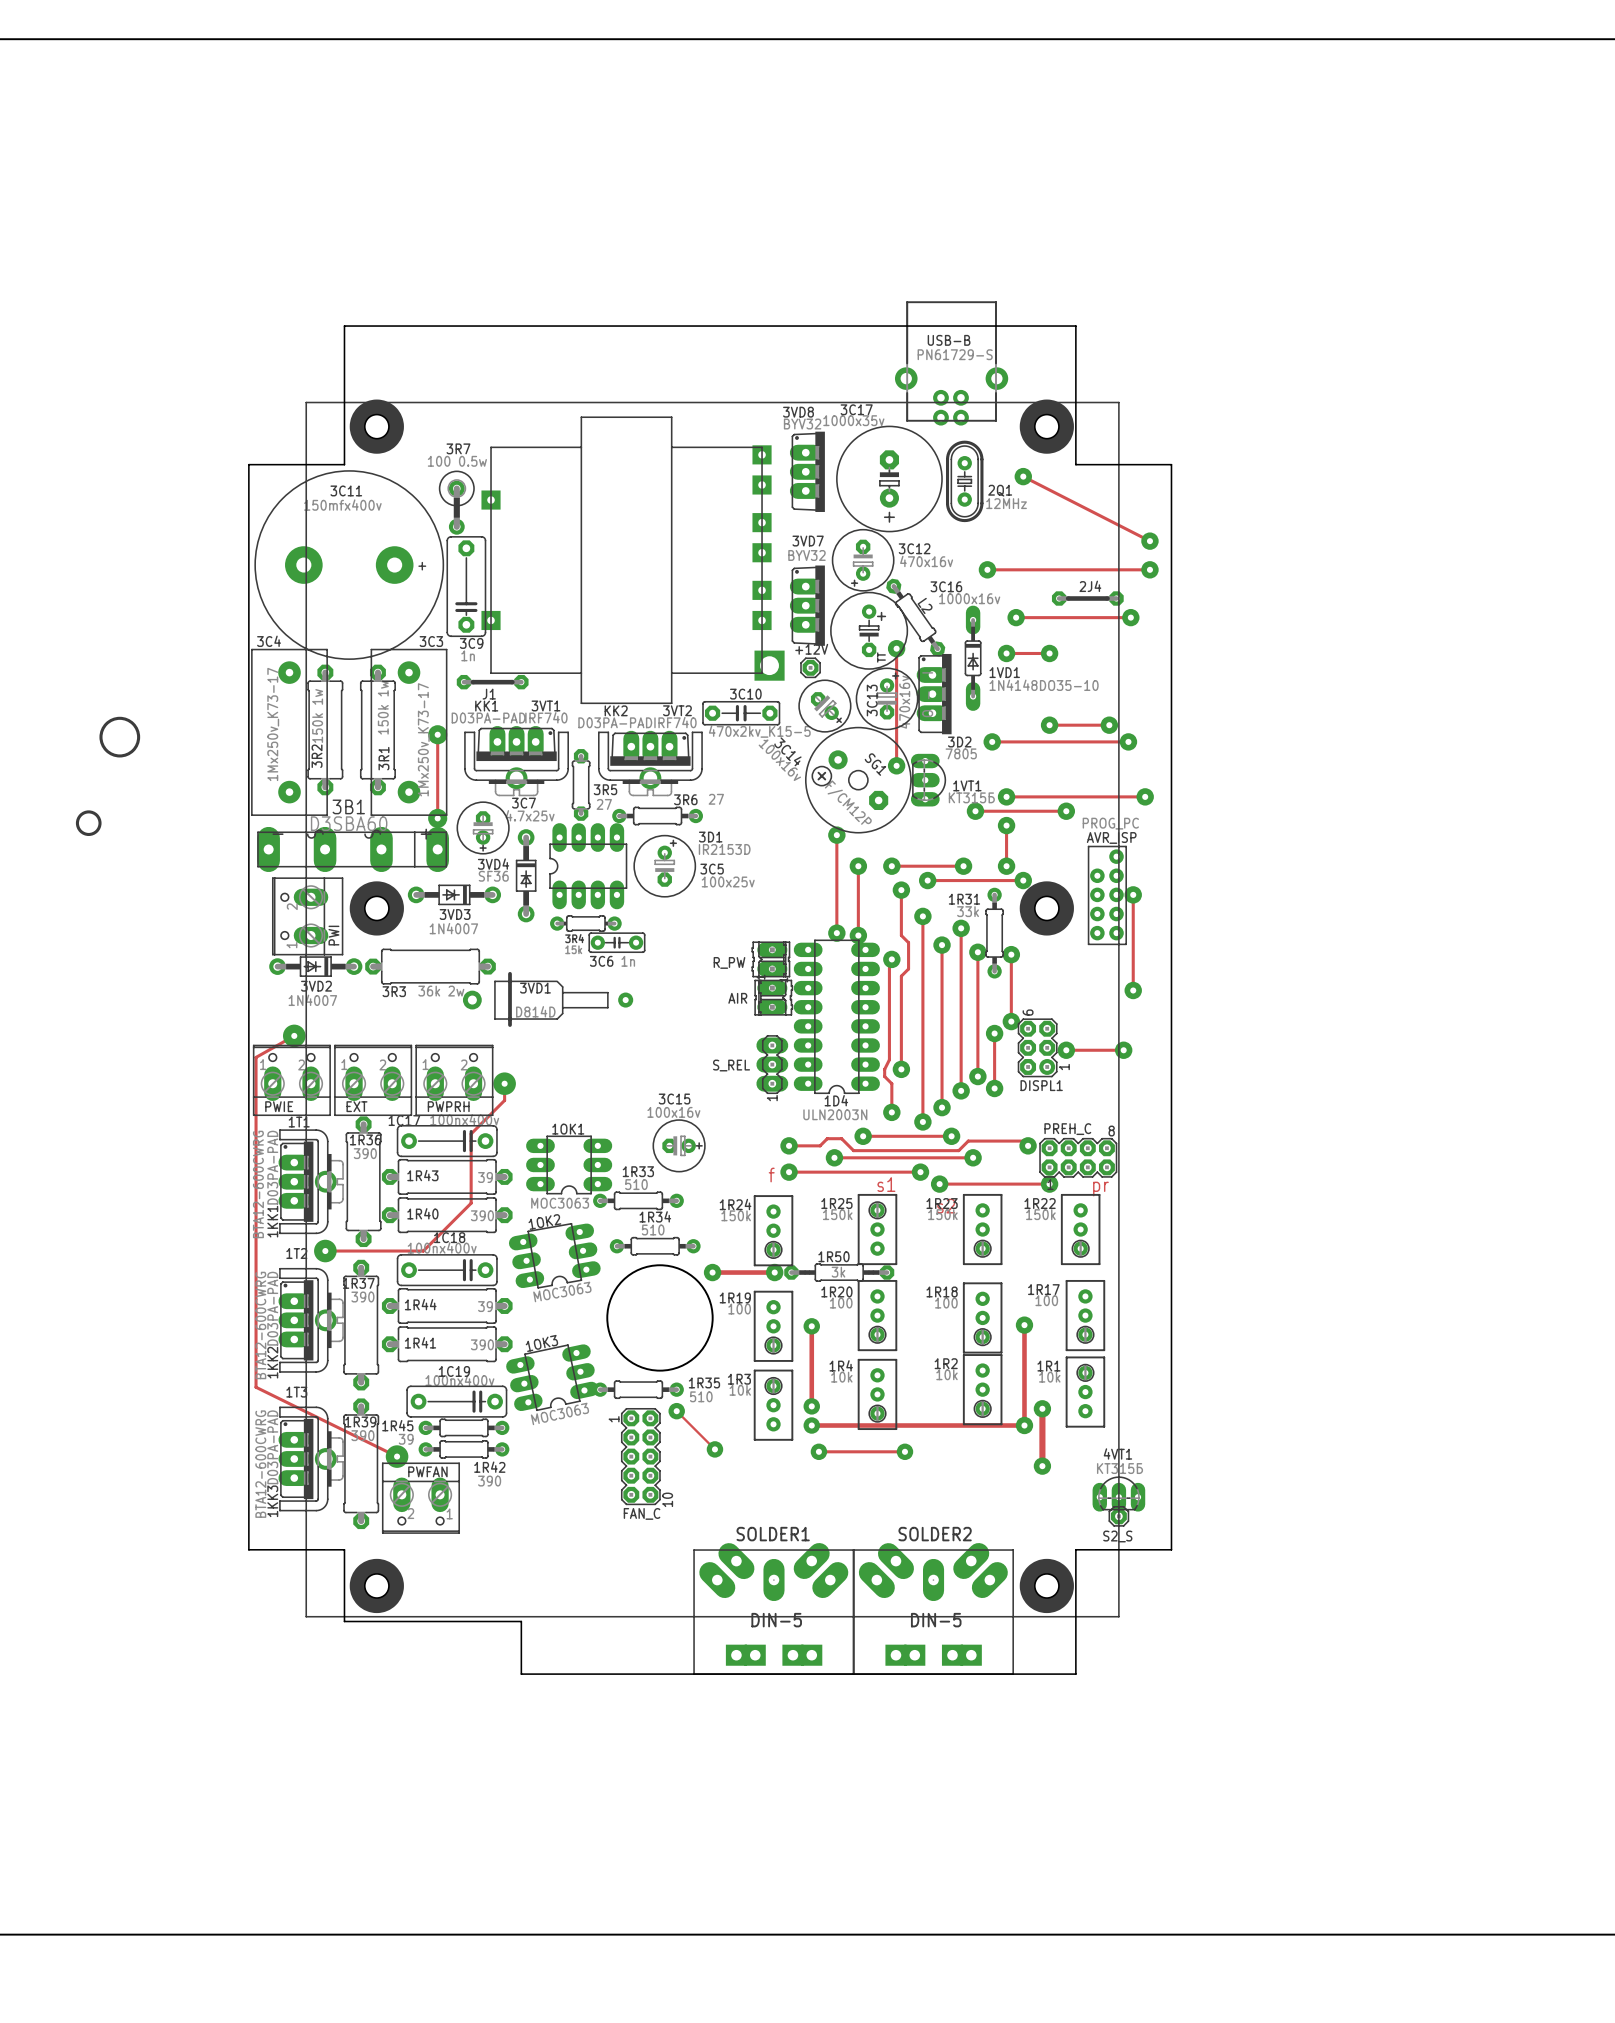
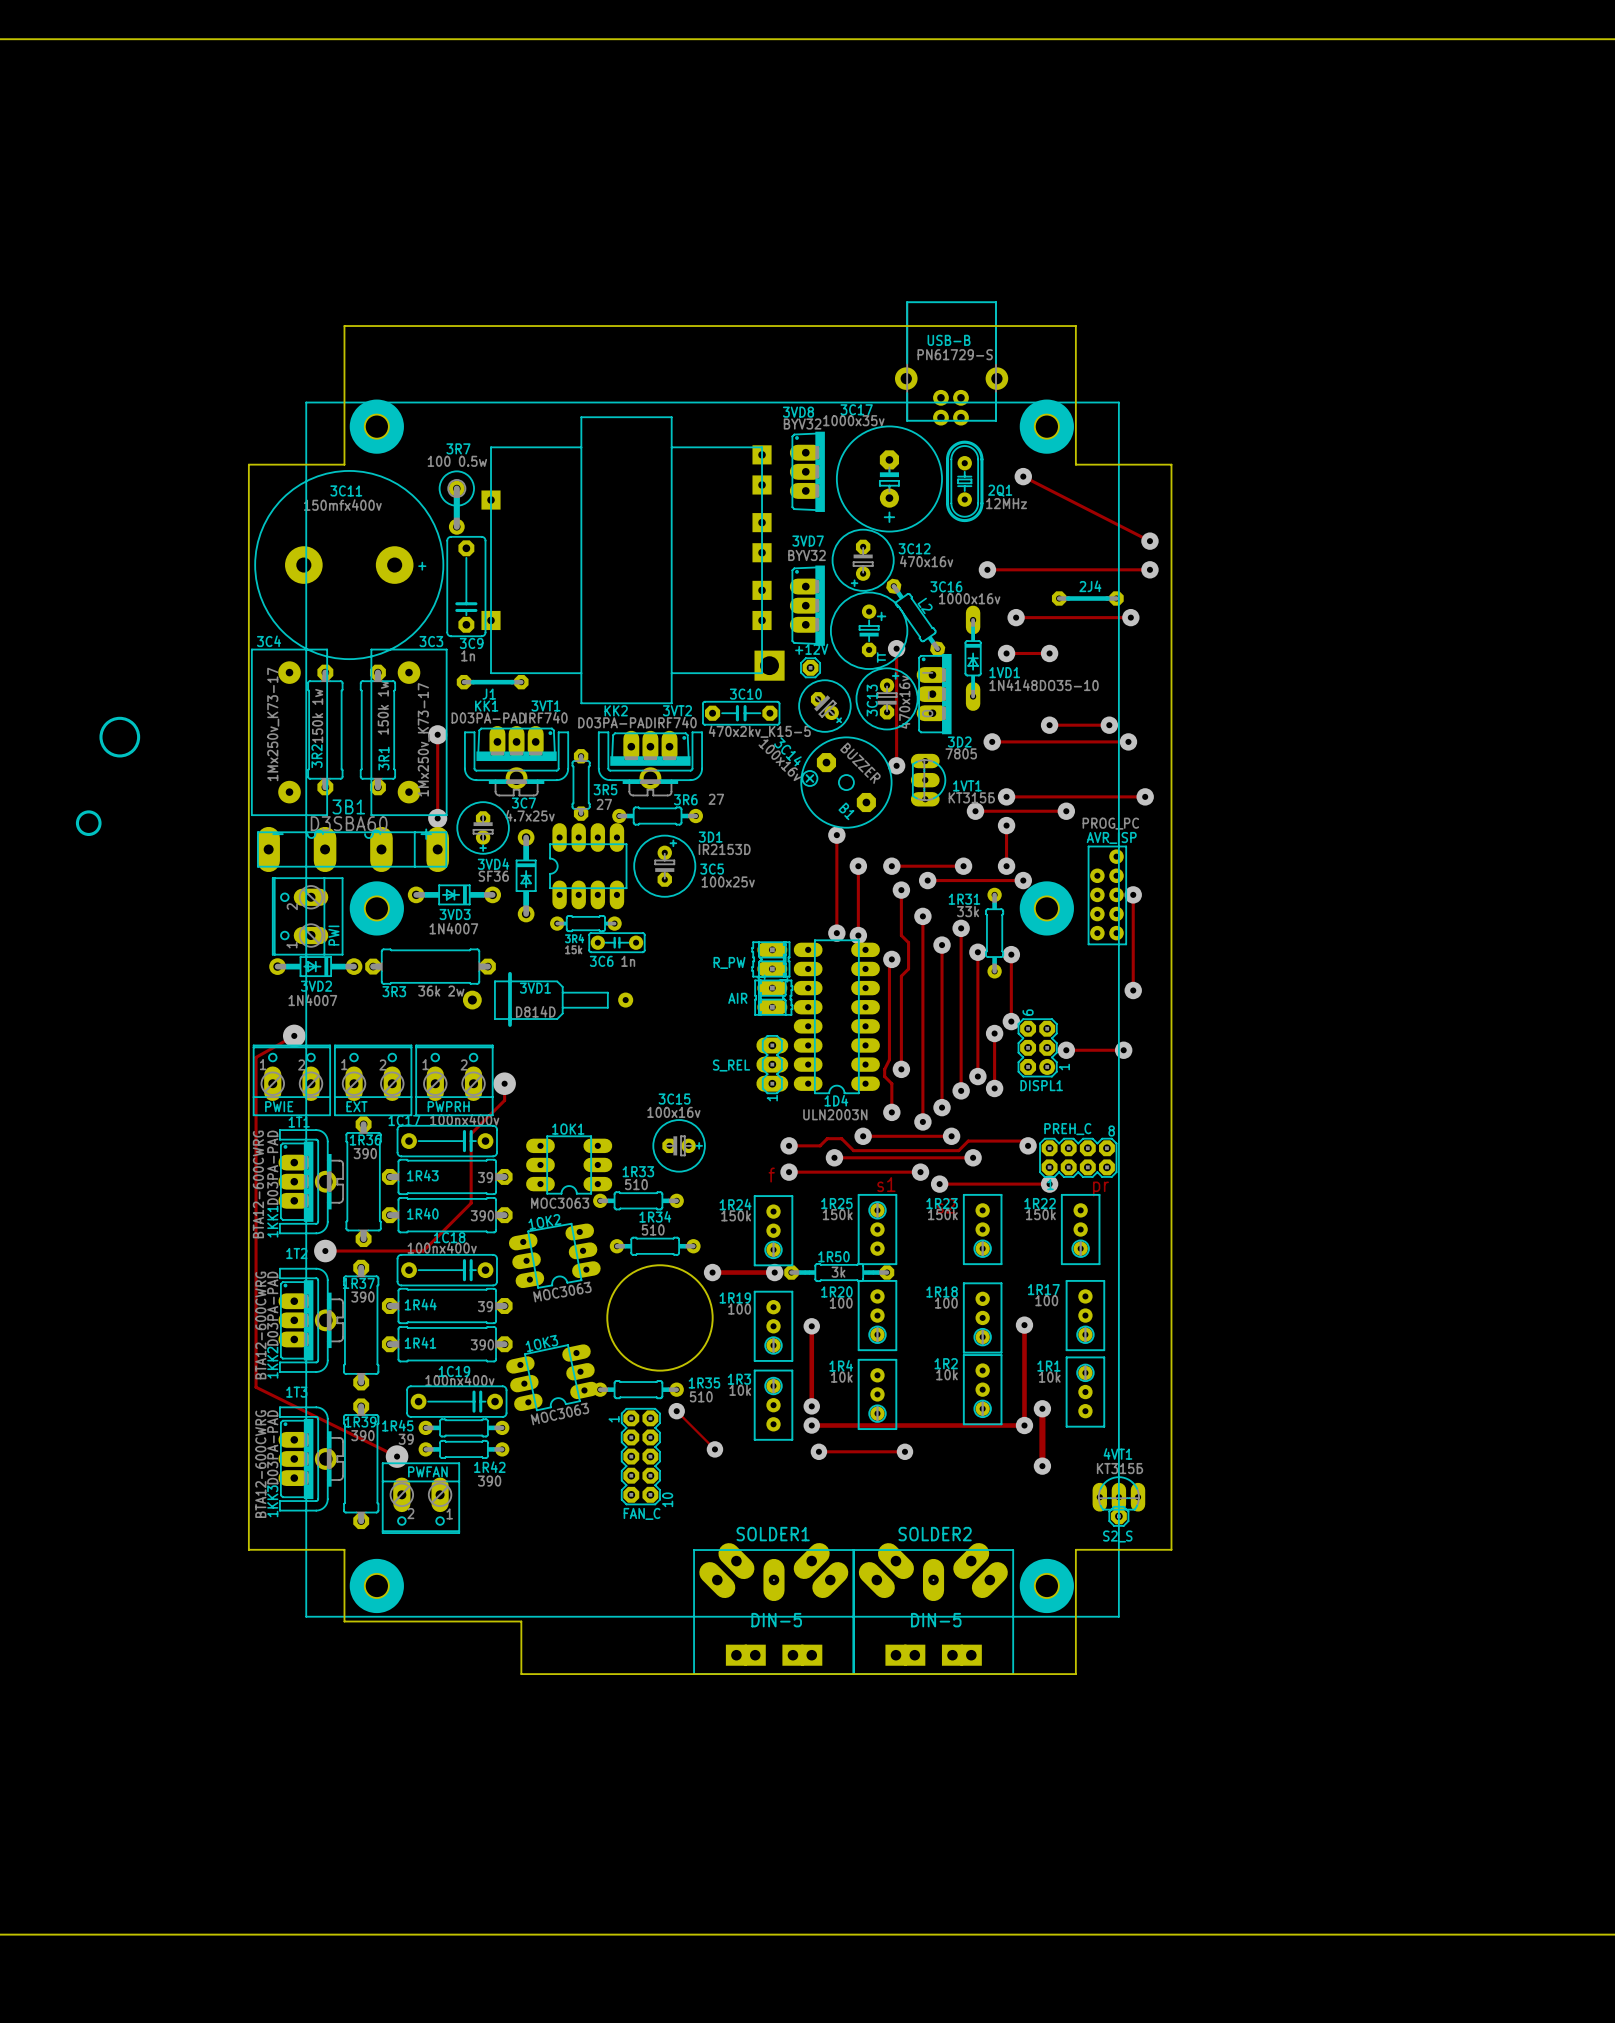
SG1: F/CM12P (858, 780) -> none
B1: none -> BUZZER (846, 782)

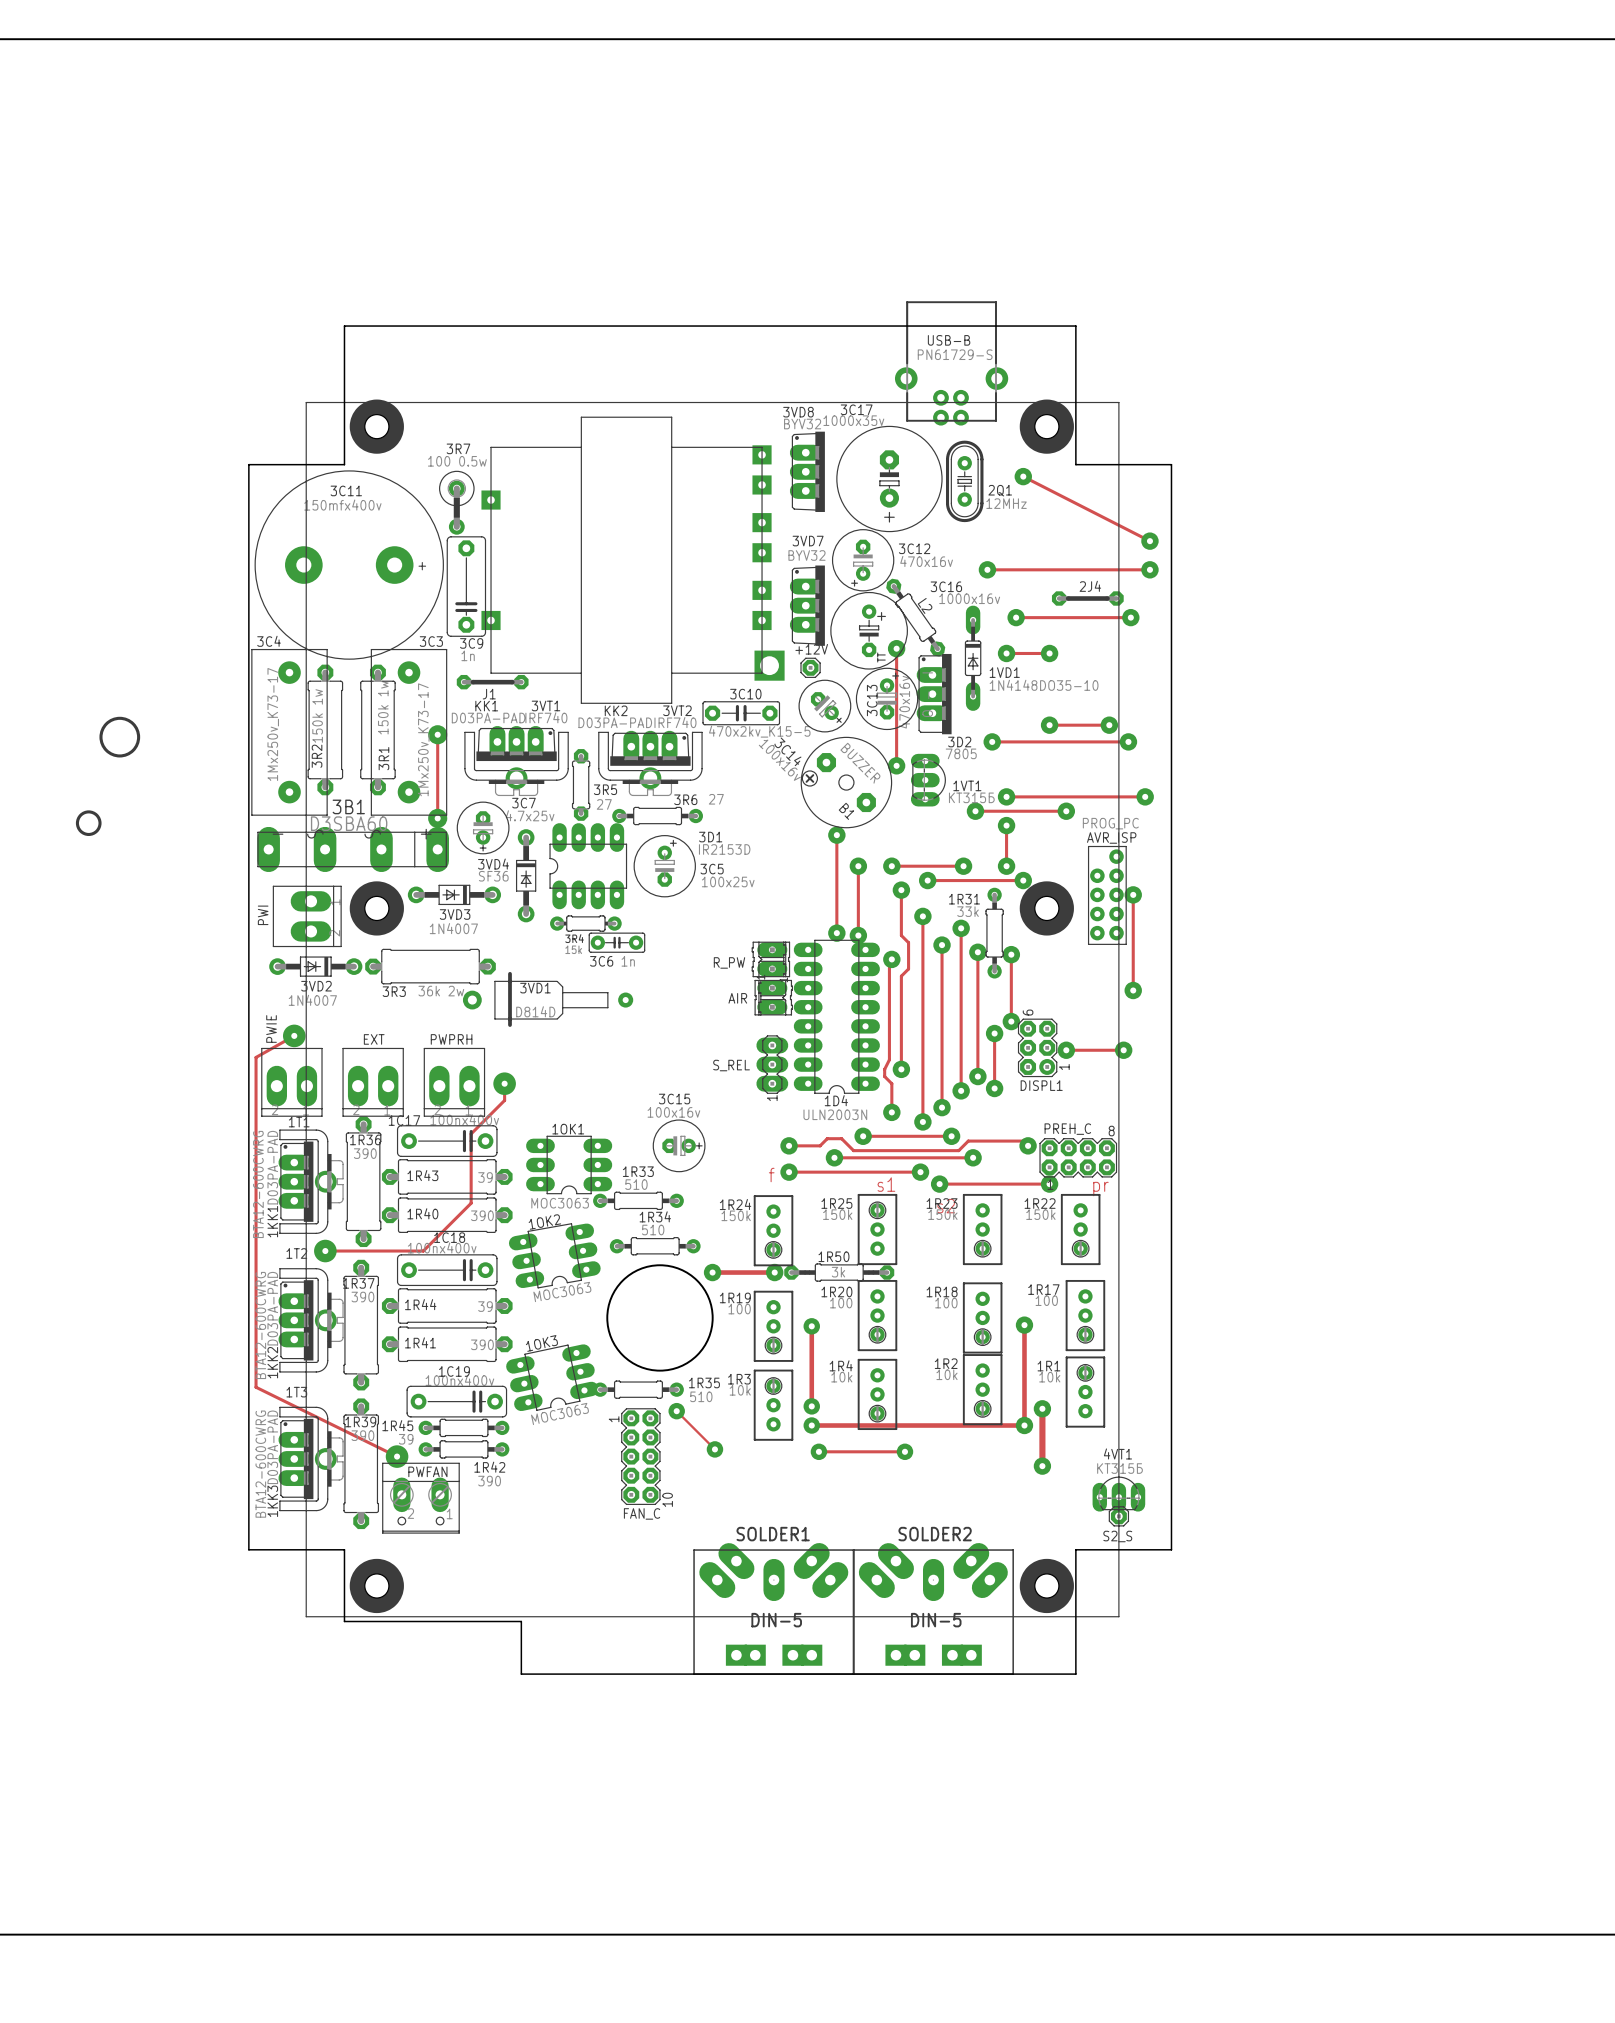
PWI footprint: [272, 877, 344, 956] -> [272, 885, 342, 947]
PWI name position: PWI (333, 935) -> PWI (263, 915)
PWIE footprint: [253, 1044, 331, 1116] -> [261, 1047, 323, 1117]
EXT footprint: [334, 1044, 412, 1116] -> [342, 1047, 404, 1117]
PWPRH footprint: [415, 1044, 494, 1116] -> [423, 1047, 486, 1117]
PWIE name position: PWIE (279, 1106) -> PWIE (271, 1028)
EXT name position: EXT (356, 1106) -> EXT (374, 1039)
PWPRH name position: PWPRH (448, 1106) -> PWPRH (451, 1039)

